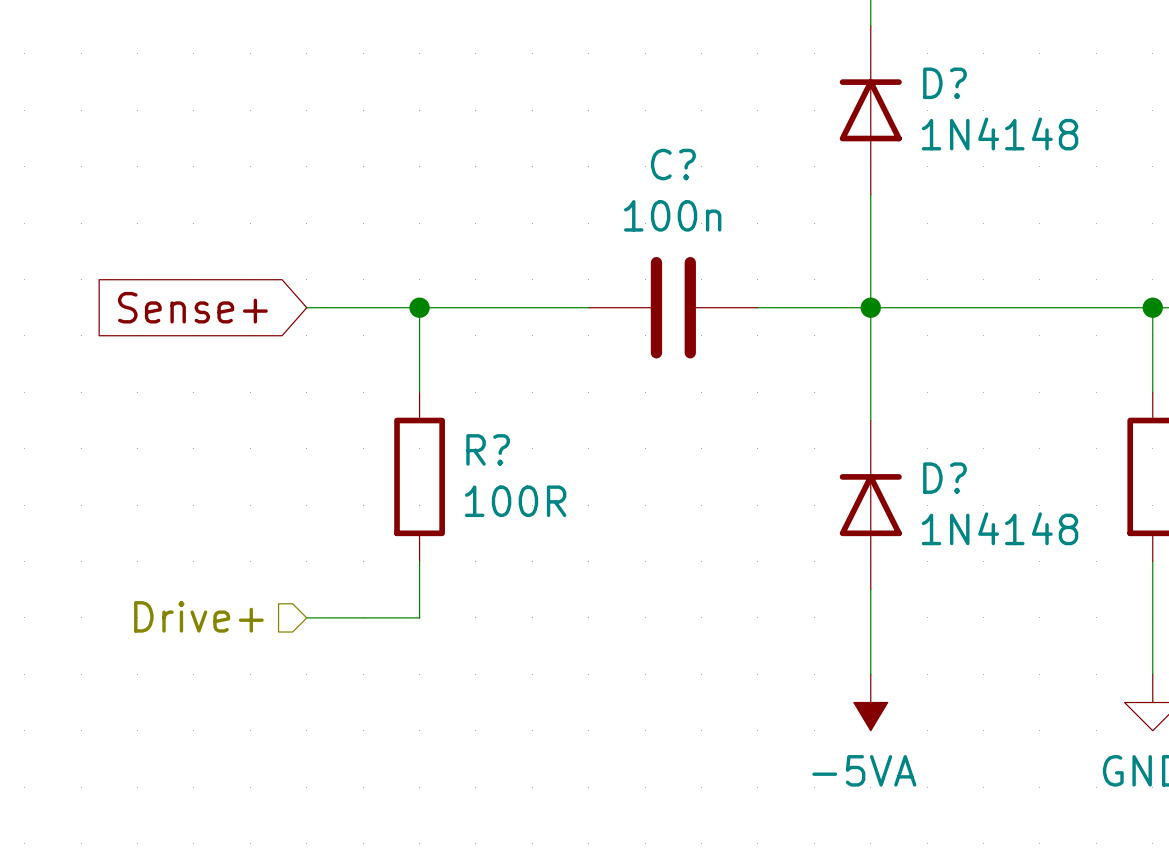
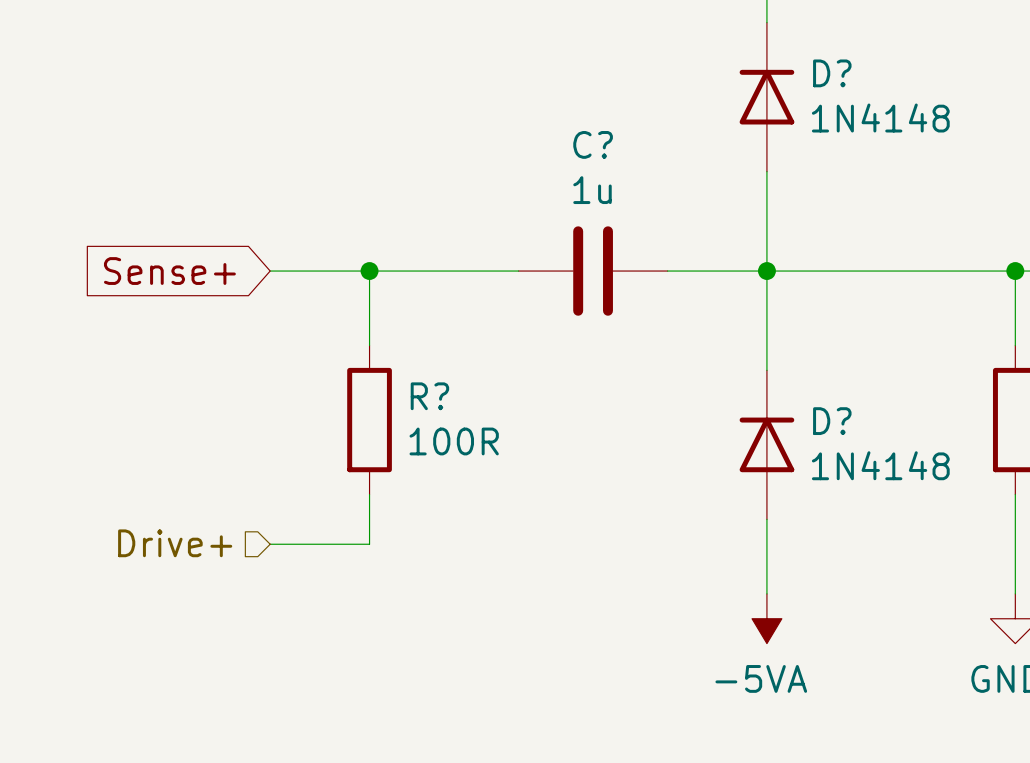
C? value: 100n (672, 215) -> 1u (592, 190)

